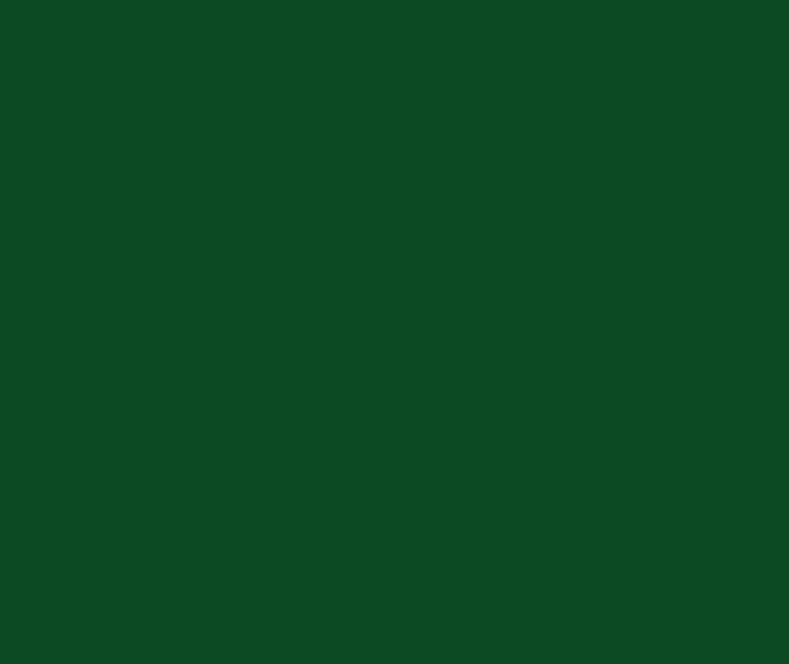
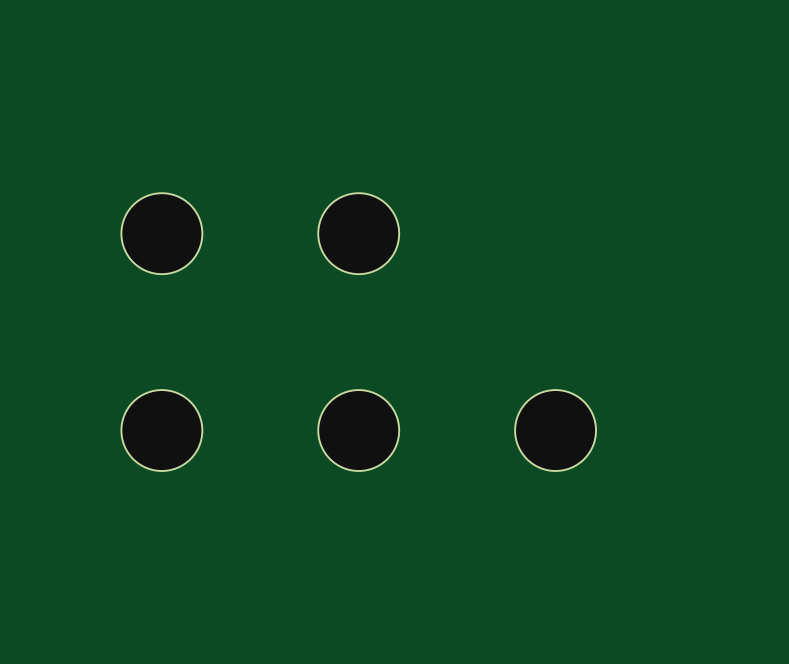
part: none -> (161, 233)
part: none -> (358, 233)
part: none -> (161, 430)
part: none -> (358, 430)
part: none -> (555, 430)

